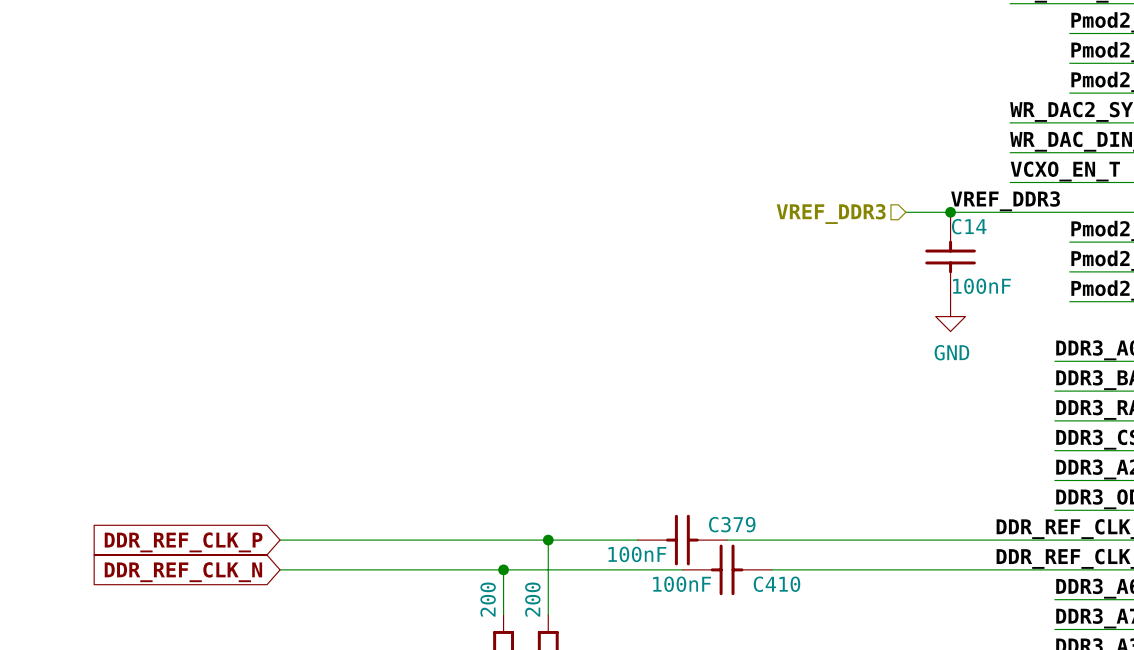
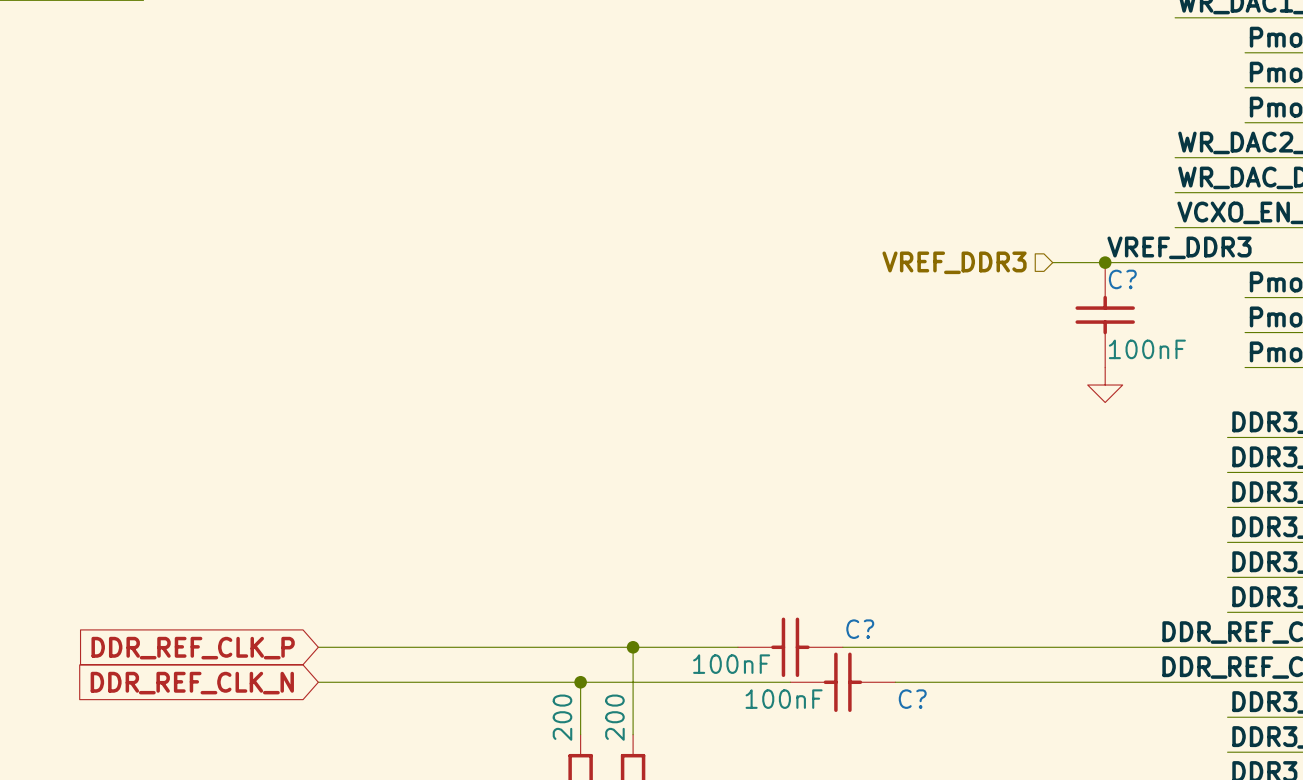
C14 name: C14 (969, 226) -> C? (1122, 279)
power symbol text: GND (951, 352) -> none
C379 name: C379 (732, 524) -> C? (860, 629)
C410 name: C410 (776, 584) -> C? (912, 699)

